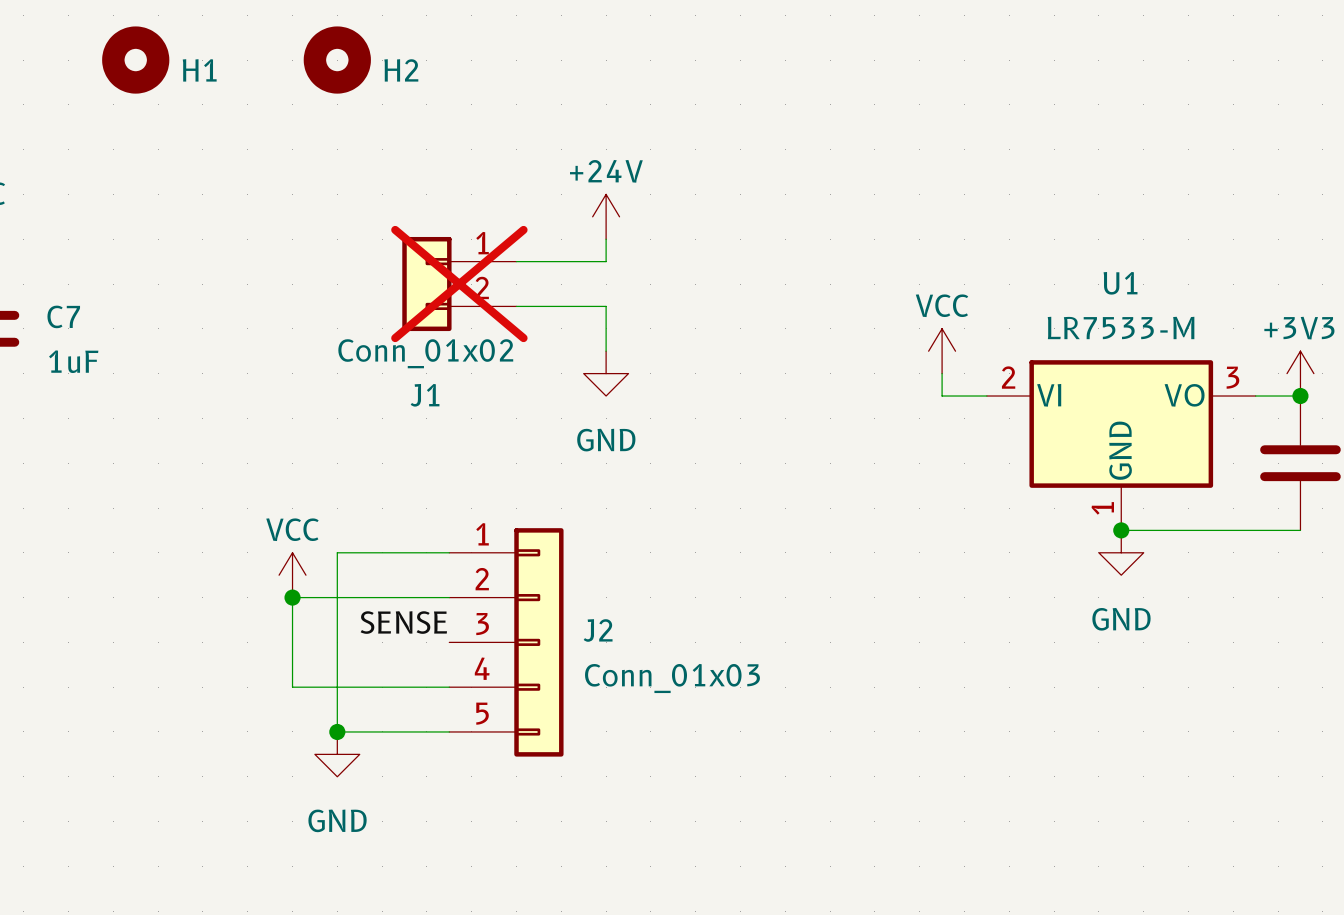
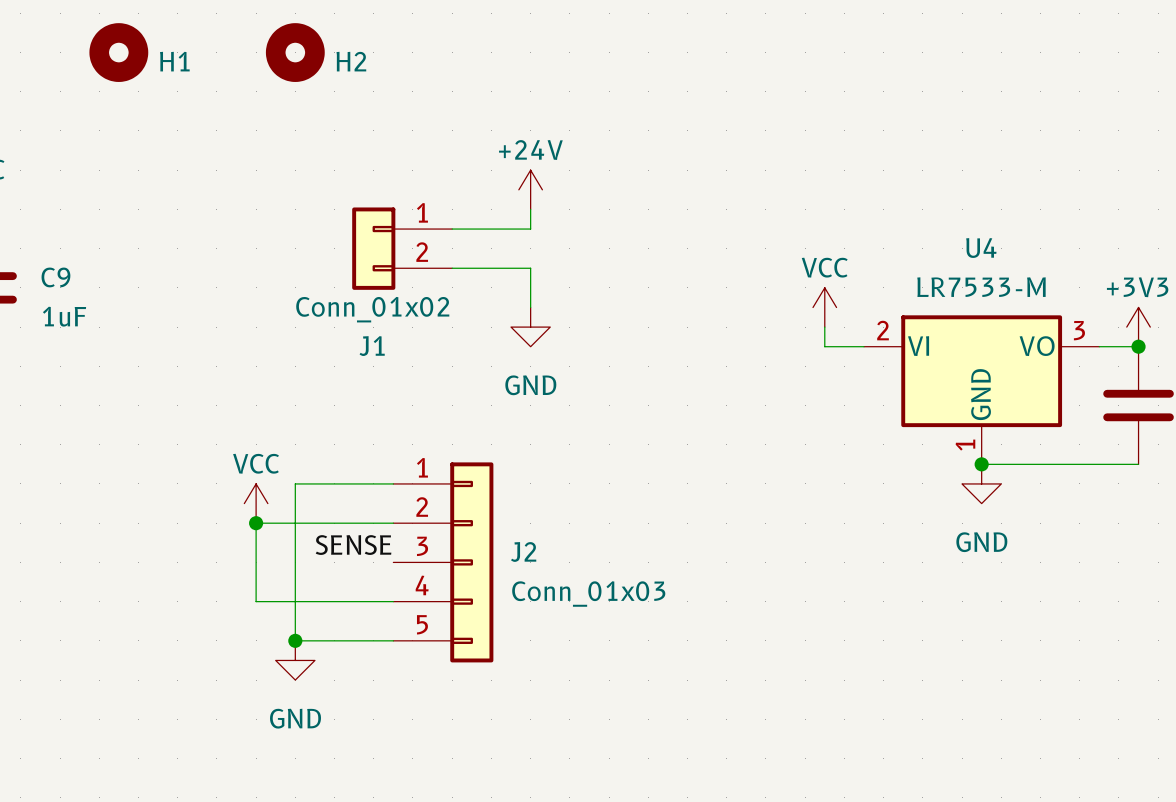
U1 name: U1 (1120, 283) -> U4 (981, 248)
J1 do-not-place cross: (459, 284) -> none
C7 name: C7 (63, 316) -> C9 (55, 277)

